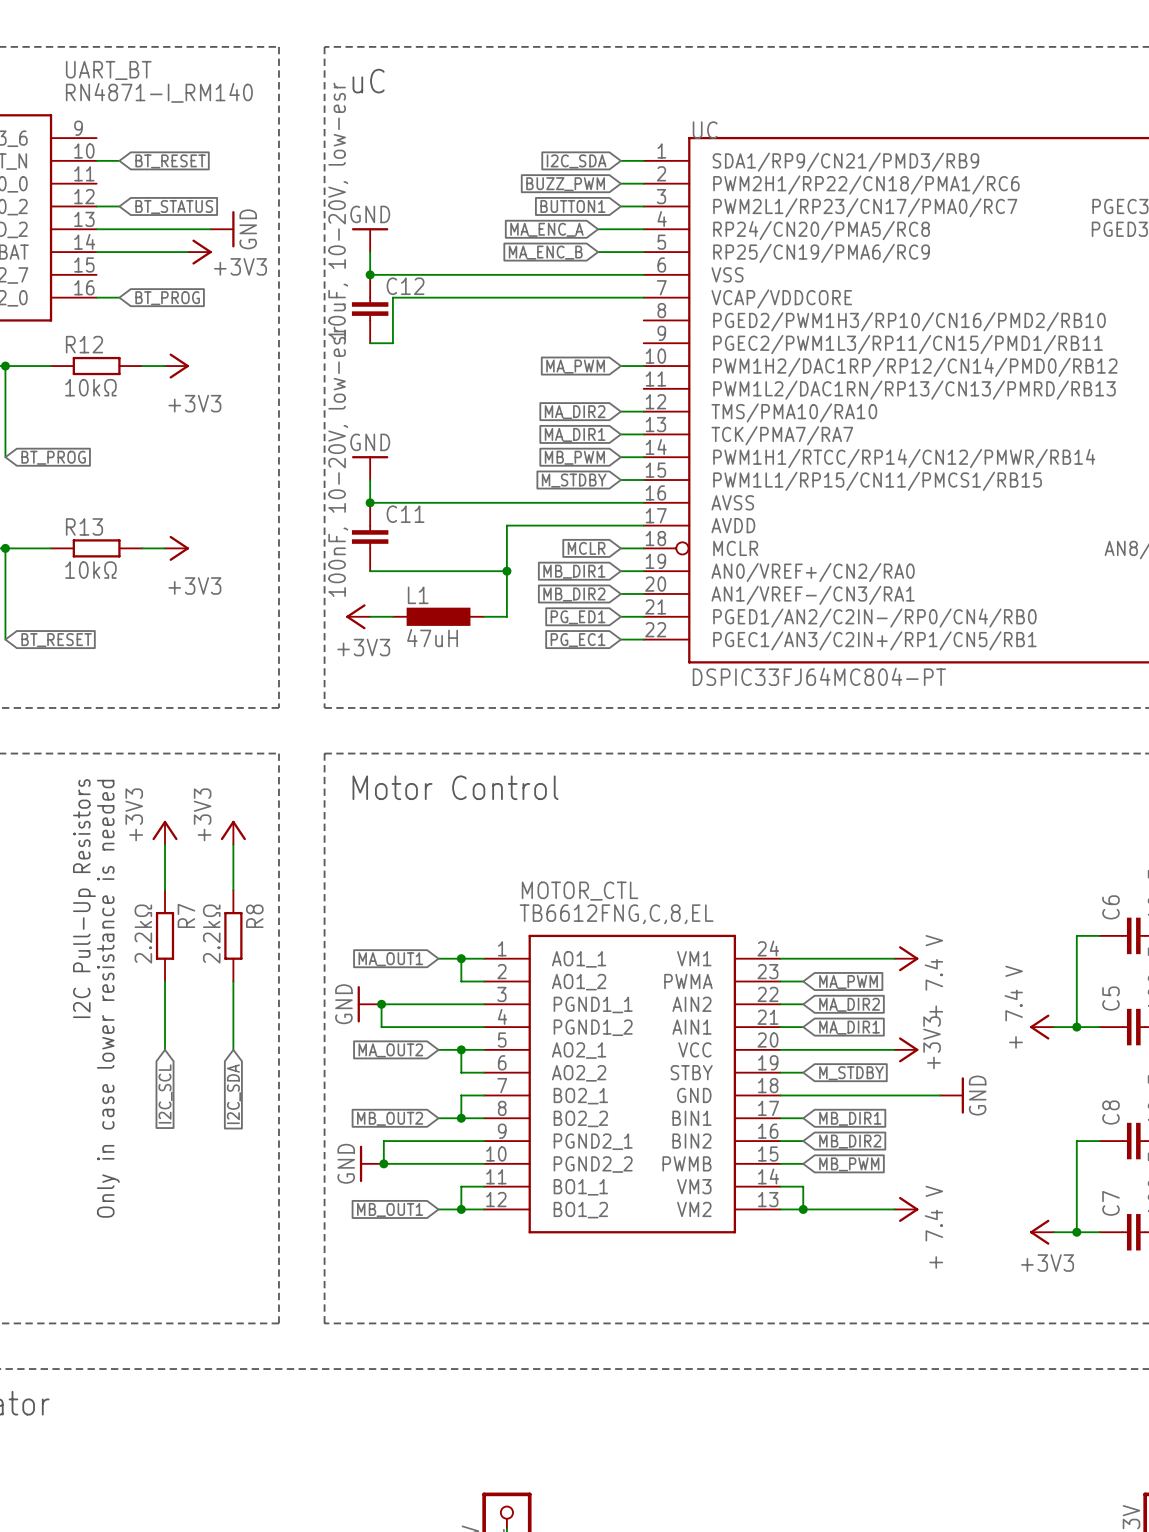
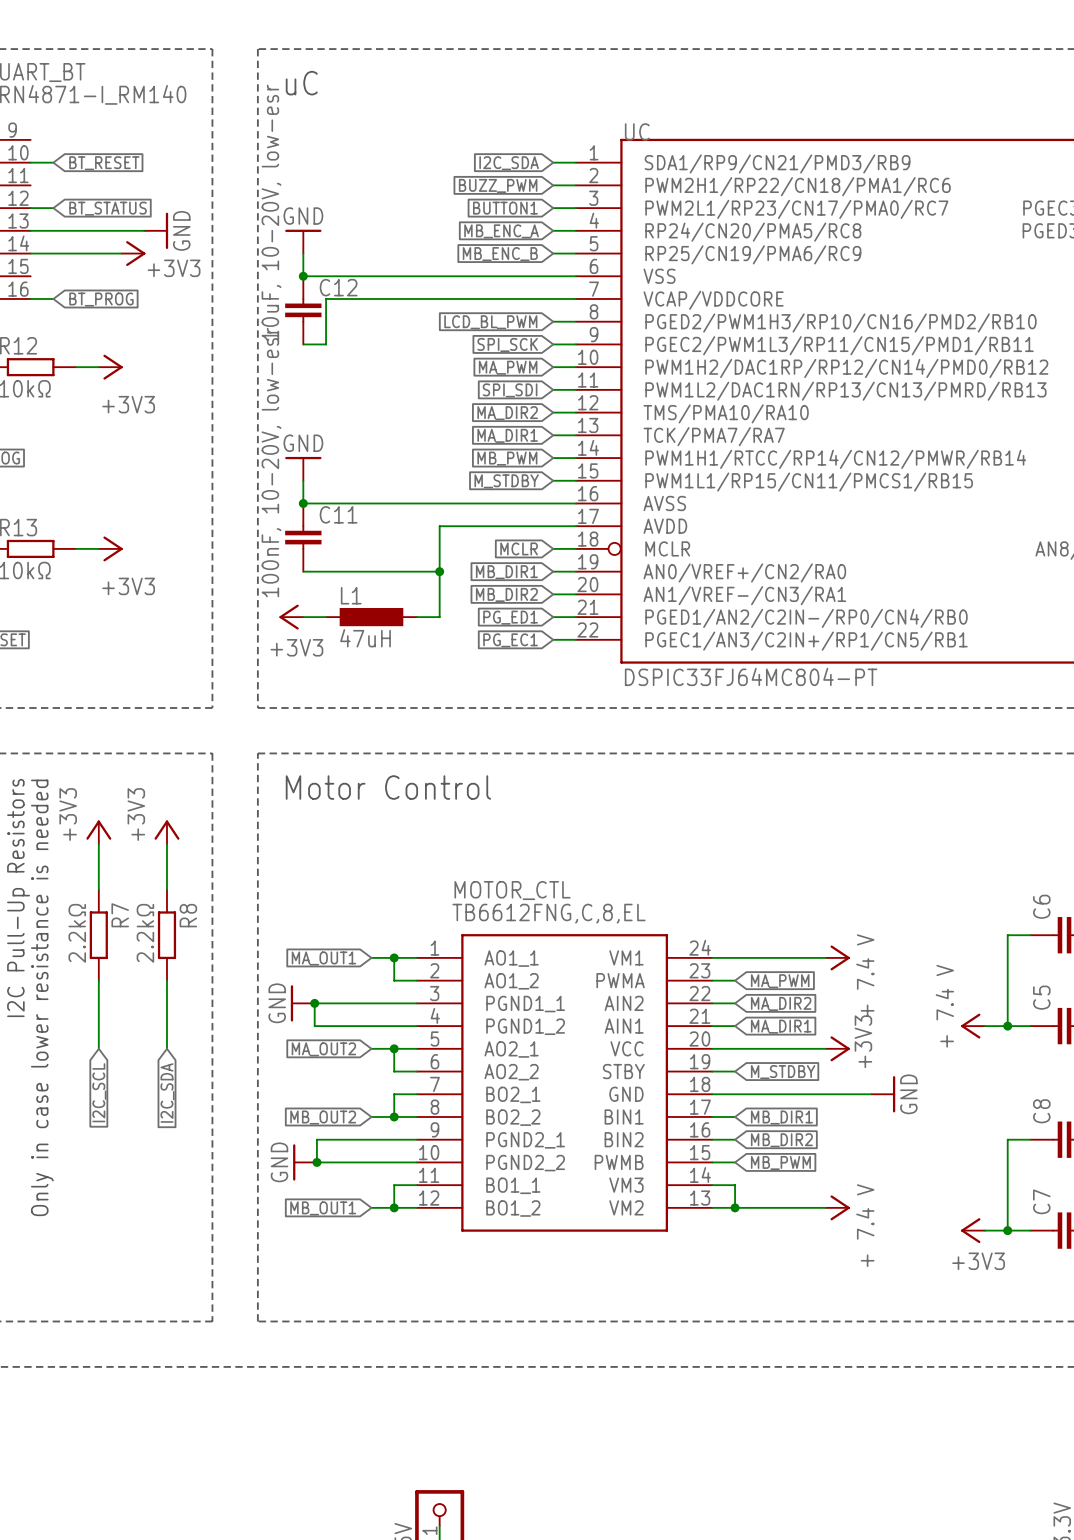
global label: MA_ENC_A (546, 229) -> none
global label: none -> MB_ENC_A (501, 231)
wire: (598, 229) (620, 229) -> (553, 344) (575, 344)
global label: MA_ENC_B (545, 252) -> none
global label: none -> MB_ENC_B (500, 254)
wire: (598, 252) (620, 252) -> (553, 321) (575, 321)
global label: none -> LCD_BL_PWM (490, 322)
global label: none -> SPI_SCK (507, 344)
wire: none -> (553, 389) (575, 389)
global label: none -> SPI_SDI (510, 390)

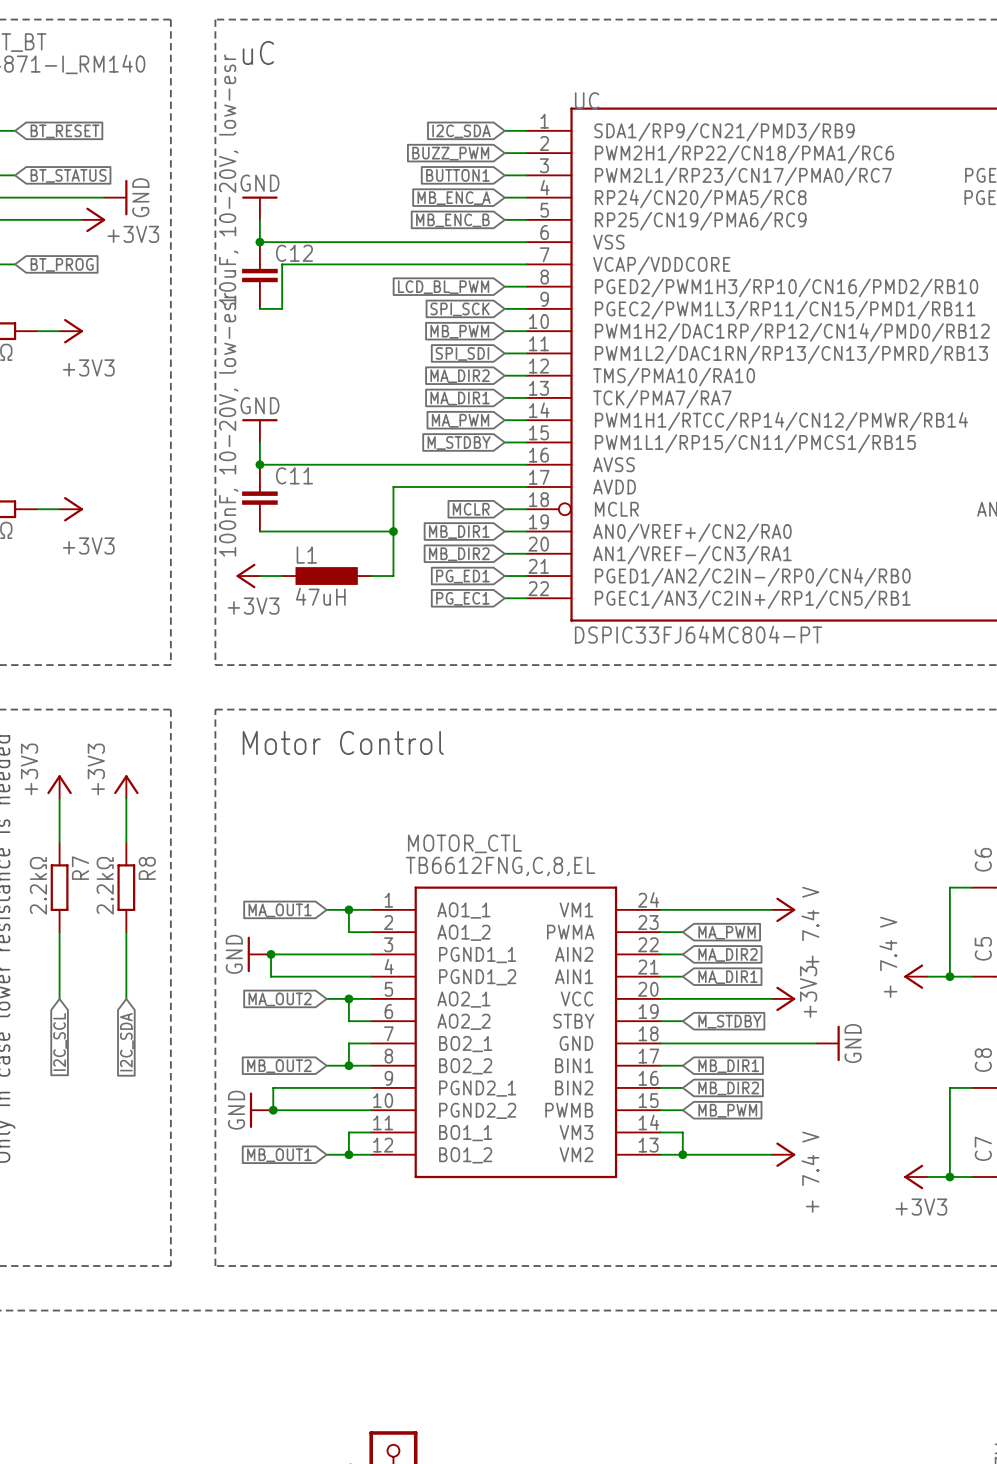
global label: MA_PWM (508, 367) -> MB_PWM (459, 331)
global label: MB_PWM (507, 458) -> MA_PWM (460, 420)

